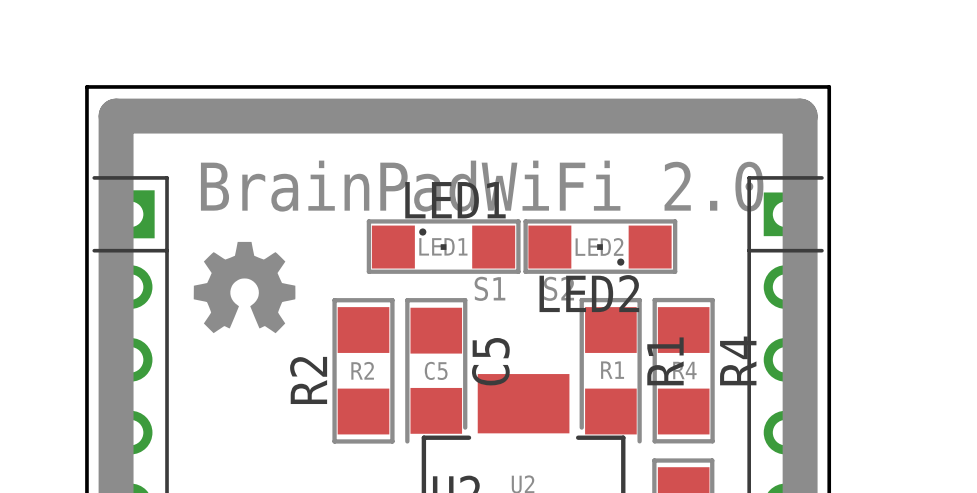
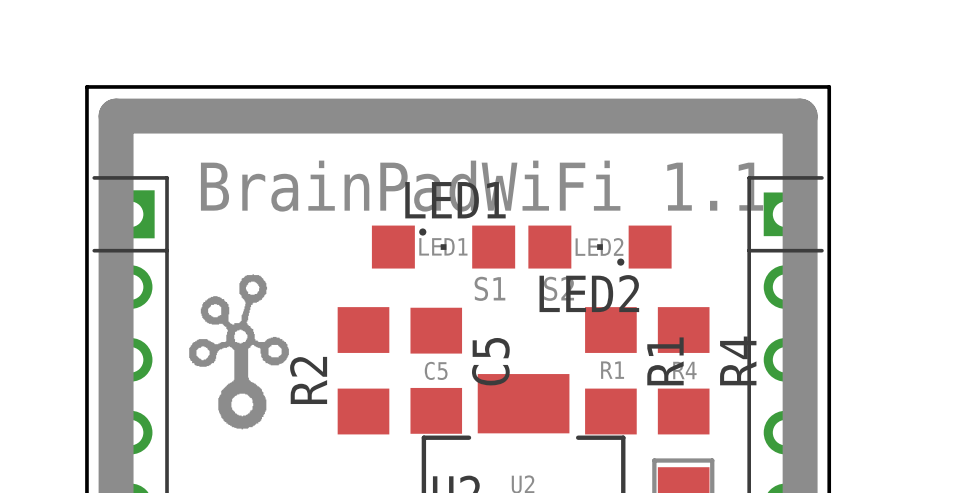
text: BrainPadWiFi 2.0 (482, 186) -> BrainPadWiFi 1.1 (482, 186)
line: (368, 221) (518, 221) (518, 271) (368, 271) (368, 221) -> none
line: (525, 221) (525, 271) (675, 271) (675, 221) (525, 221) -> none
drawing: [193, 241, 296, 334] -> none
drawing: none -> [189, 274, 289, 430]
line: (334, 300) (392, 300) (392, 441) (334, 441) (334, 300) -> none
line: (654, 300) (712, 300) (712, 441) (654, 441) (654, 300) -> none
text: R2 (362, 370) -> none
line: (465, 427) (465, 300) (407, 300) (407, 441) -> none
line: (581, 427) (581, 300) (639, 300) (639, 441) -> none

